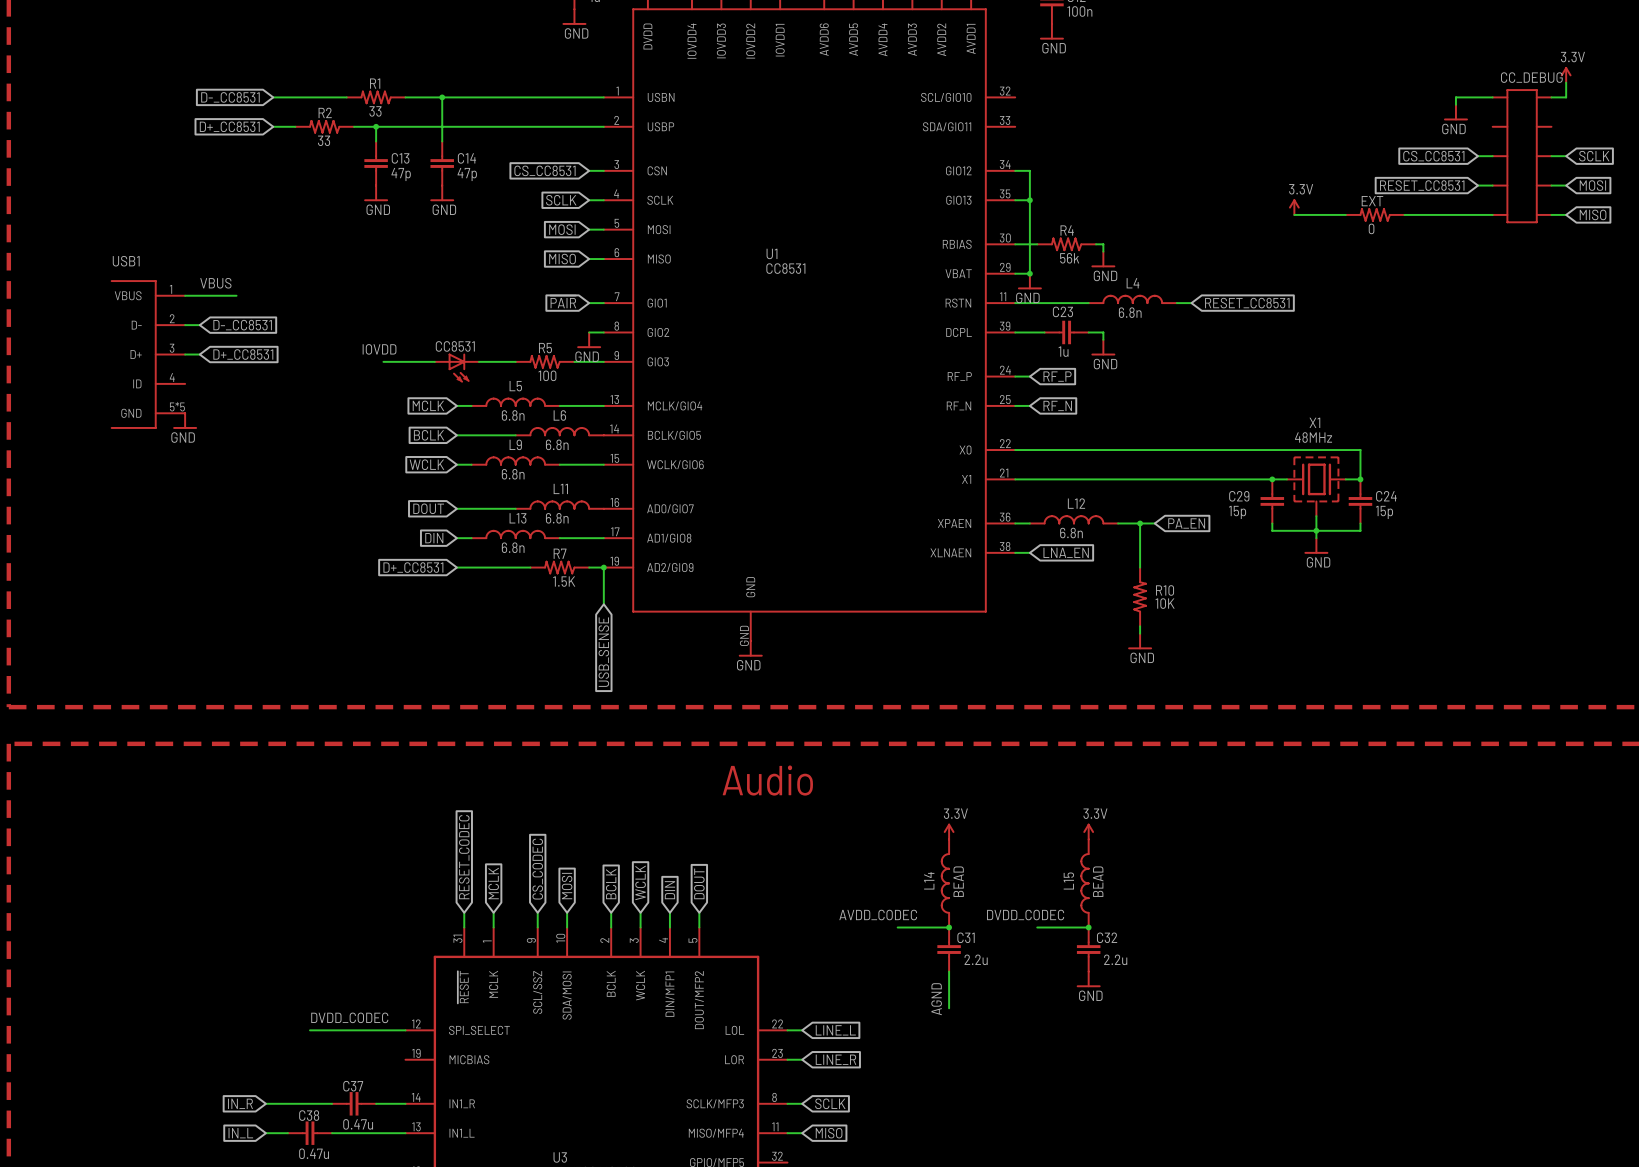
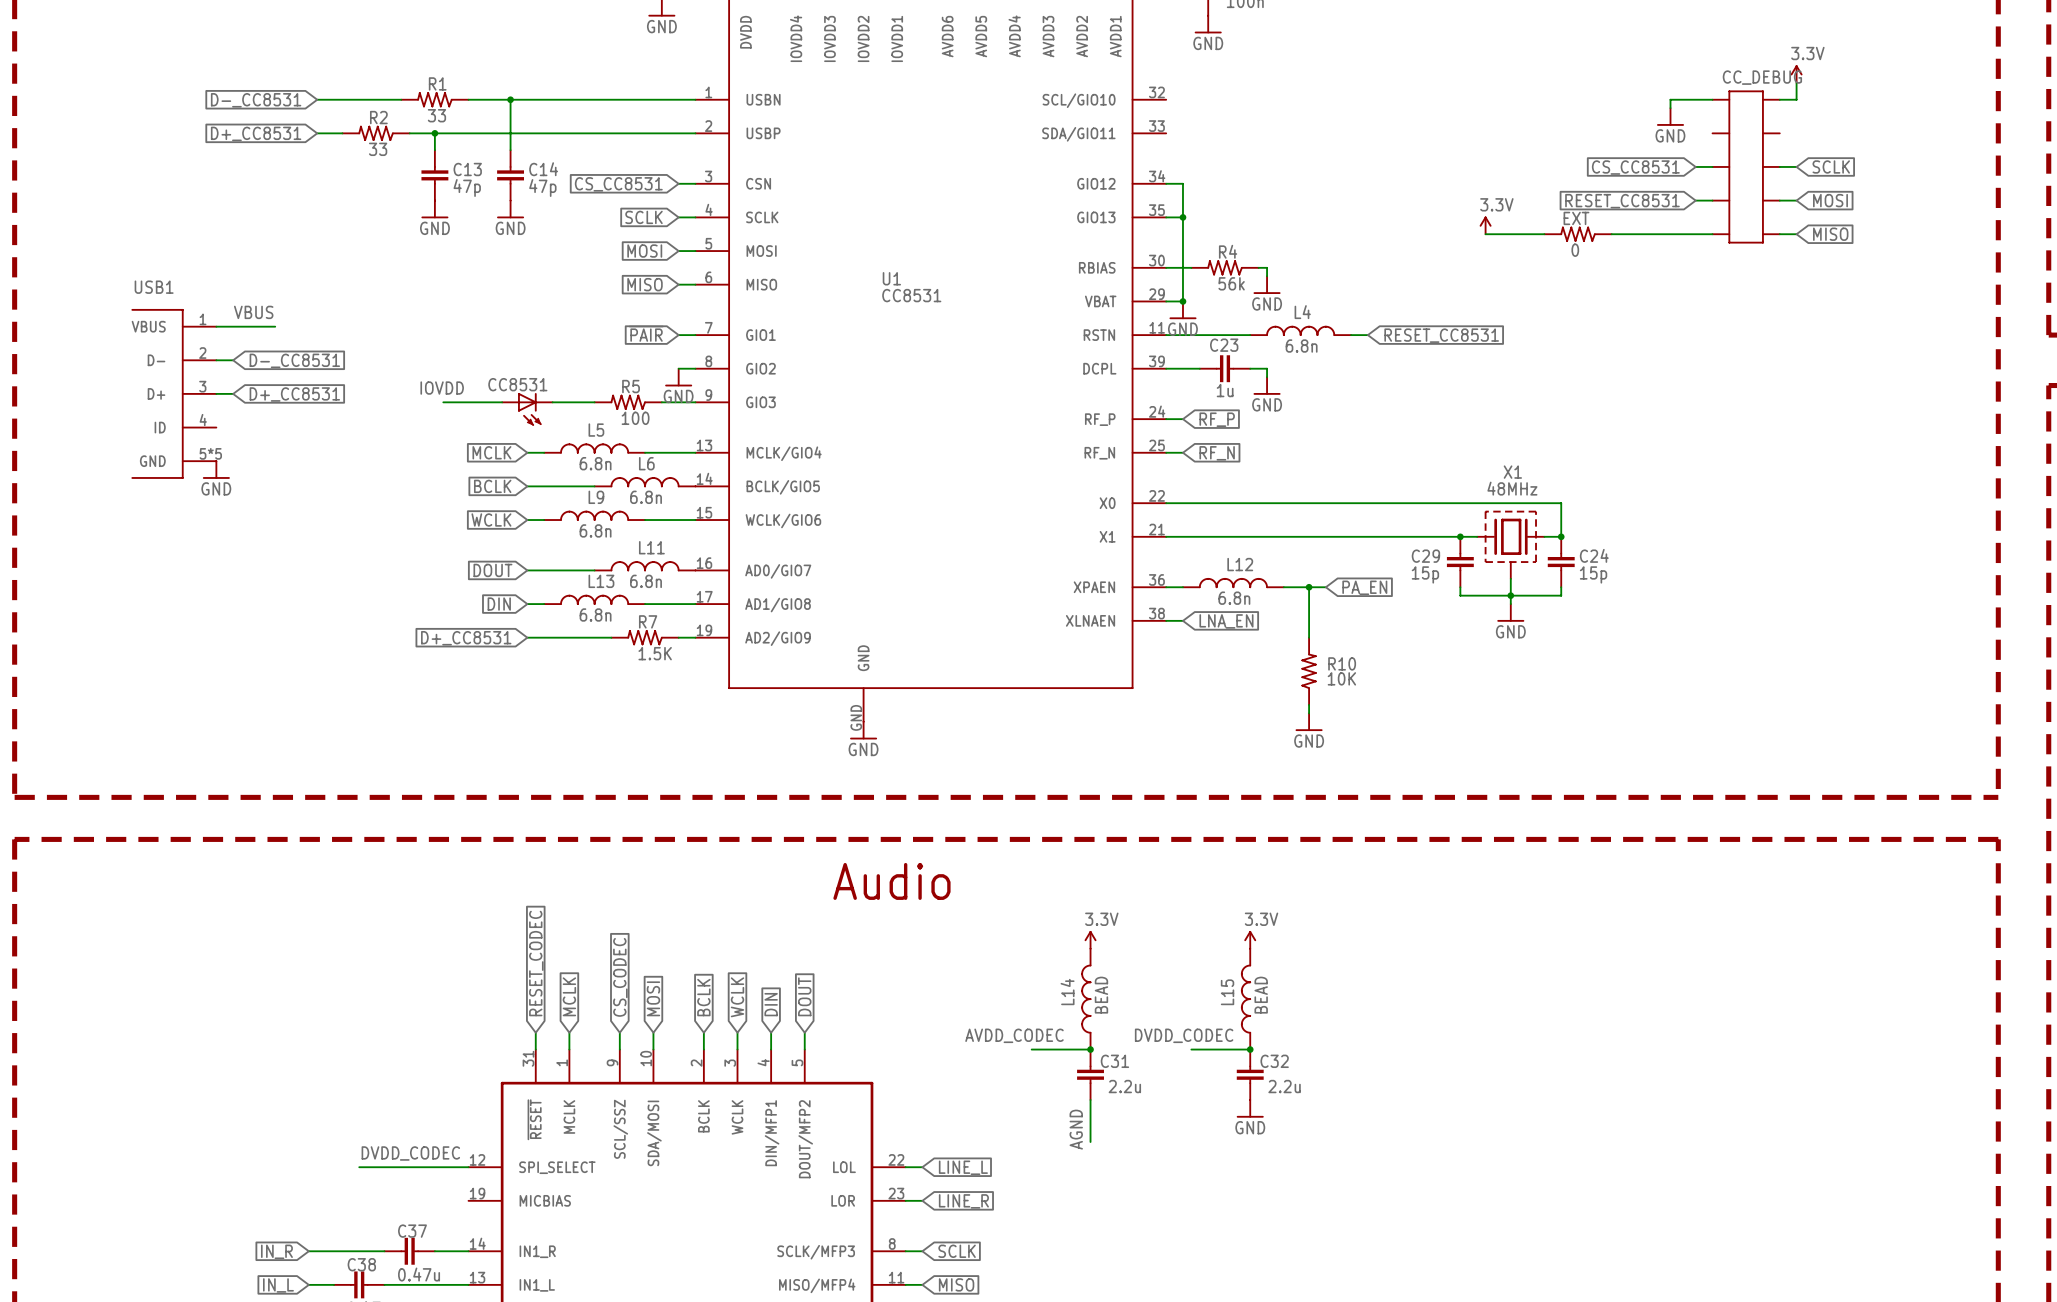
wire: (603, 567) (603, 604) -> none
junction: (603, 567) -> none
global label: USB_SENSE (603, 652) -> none

